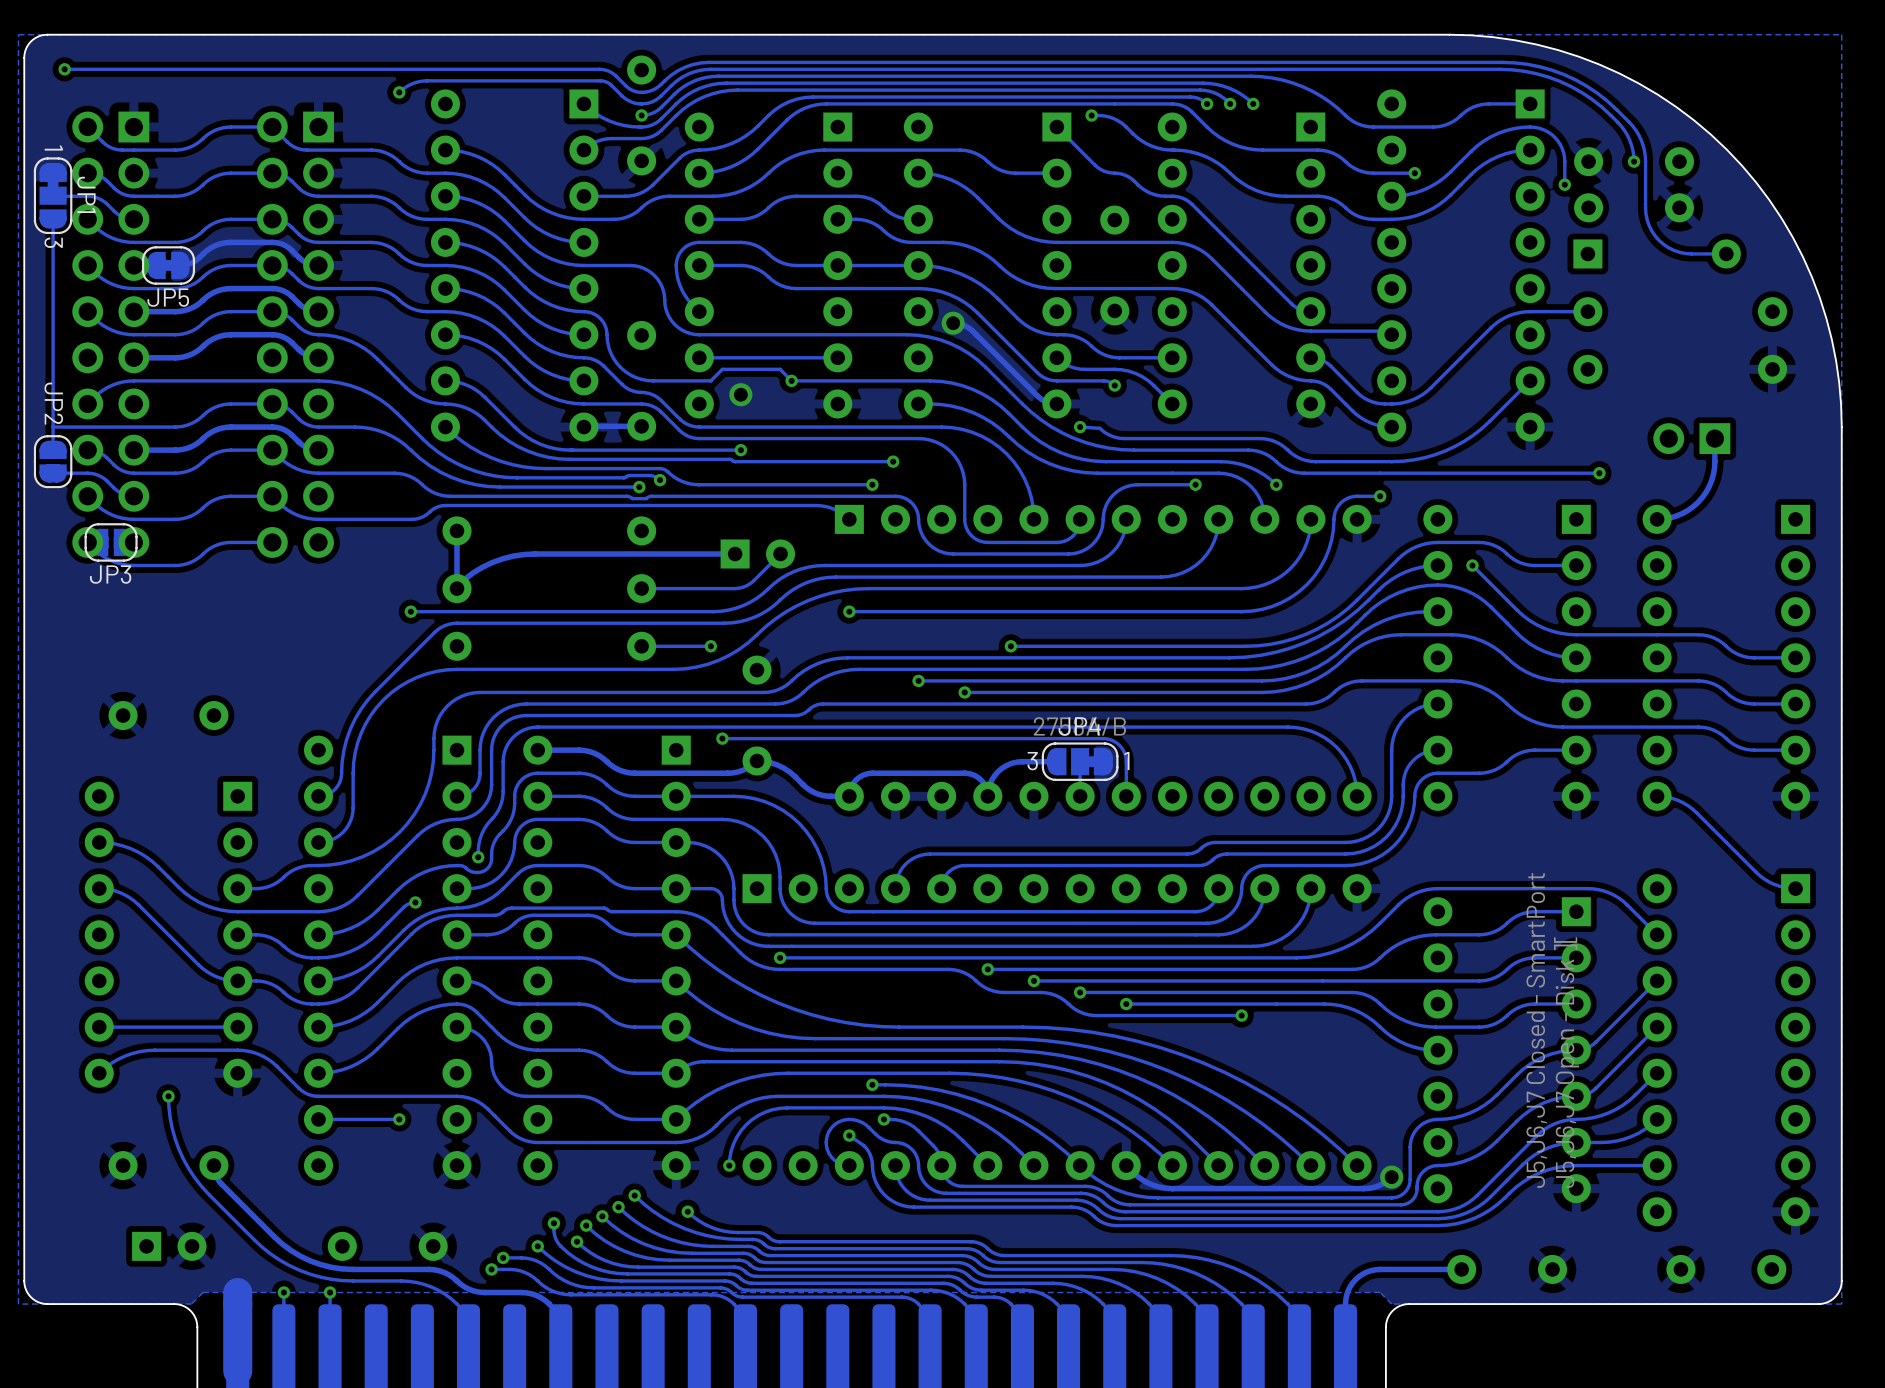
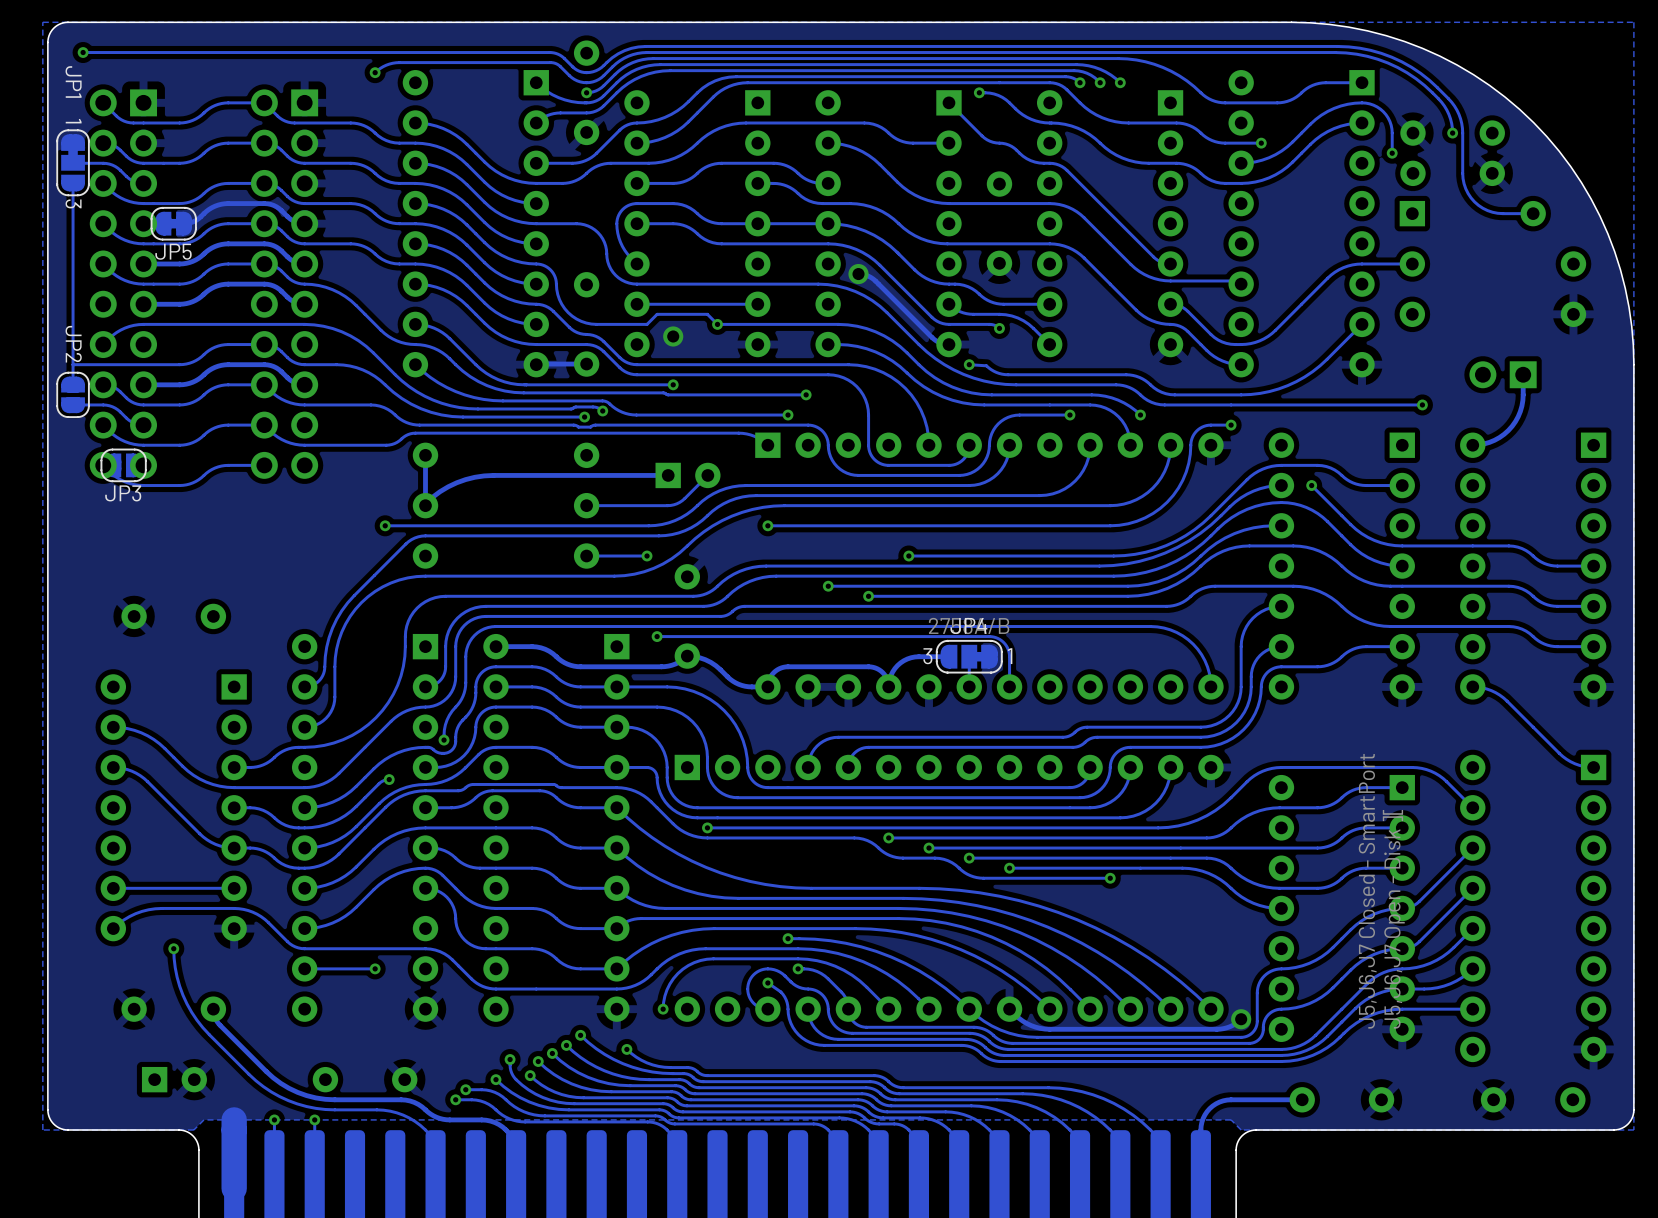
JP1 name position: JP1 (86, 194) -> JP1 (73, 82)

